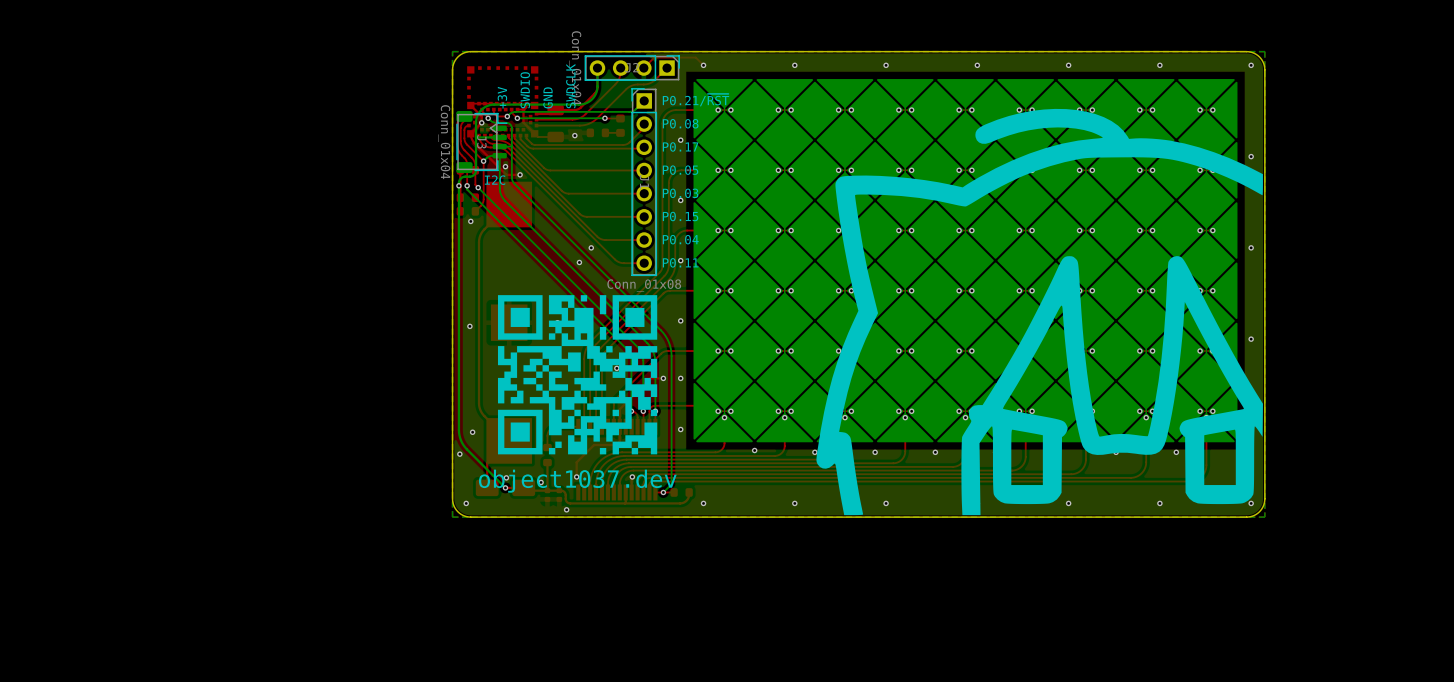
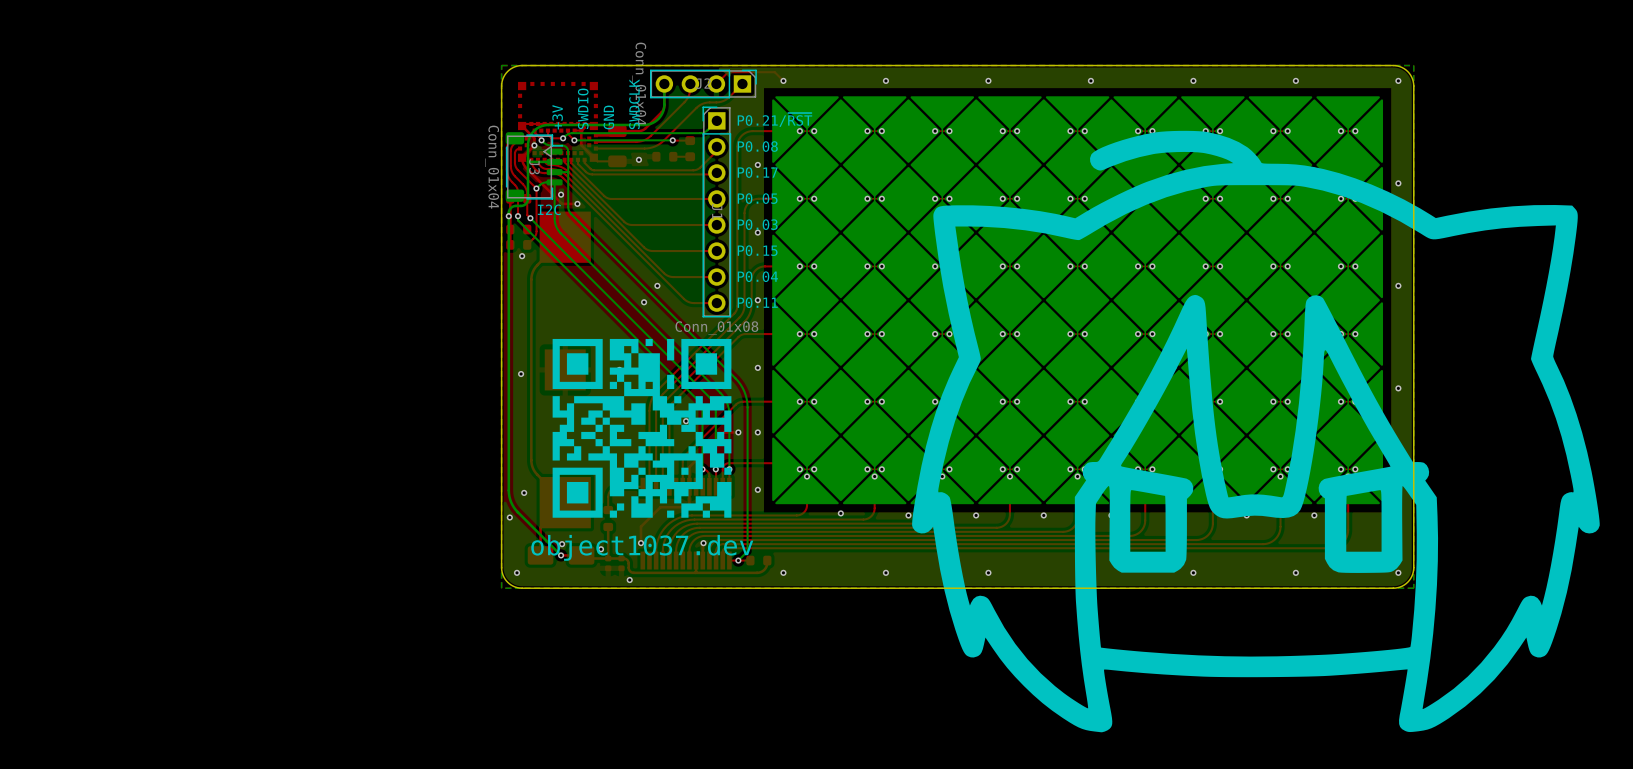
drawing: [816, 108, 1263, 516] -> none
drawing: none -> [912, 130, 1600, 733]

